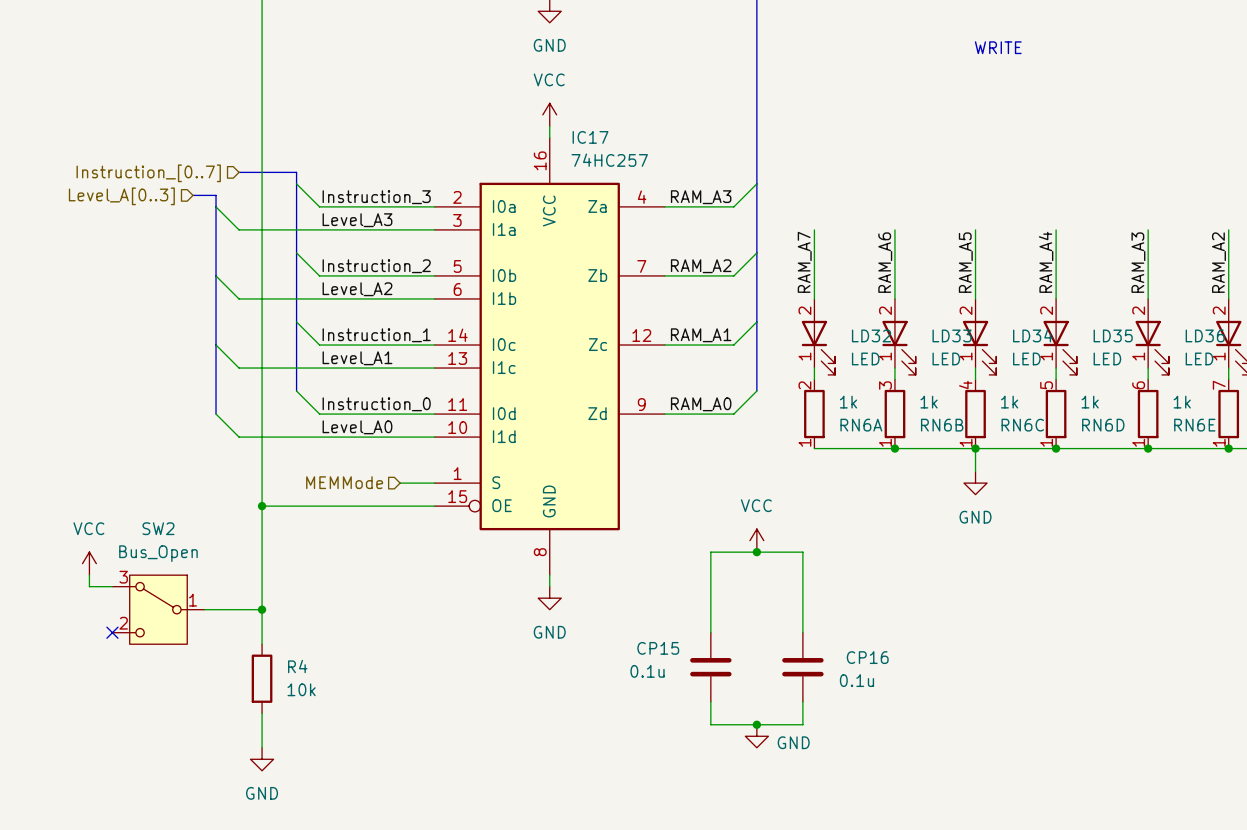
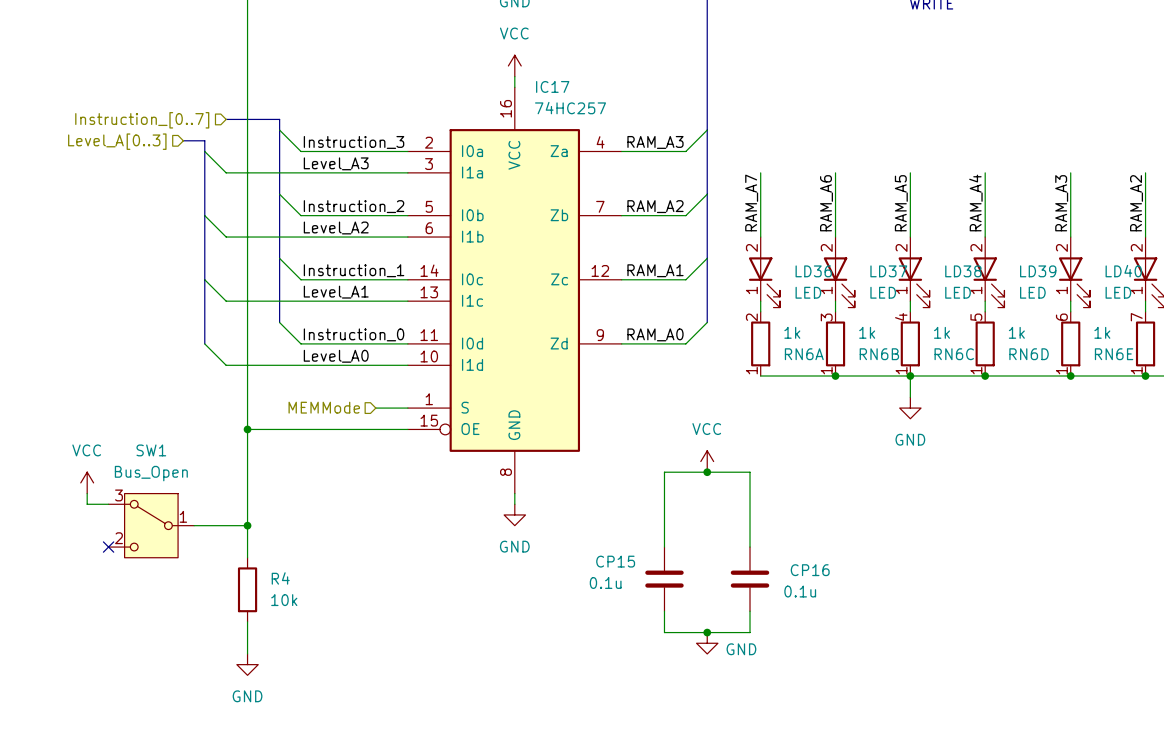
LD32 name: LD32 (871, 335) -> LD36 (813, 271)
LD33 name: LD33 (952, 335) -> LD37 (888, 271)
LD34 name: LD34 (1032, 335) -> LD38 (963, 271)
LD35 name: LD35 (1113, 335) -> LD39 (1038, 271)
LD36 name: LD36 (1205, 335) -> LD40 (1123, 271)
SW2 name: SW2 (158, 528) -> SW1 (151, 450)

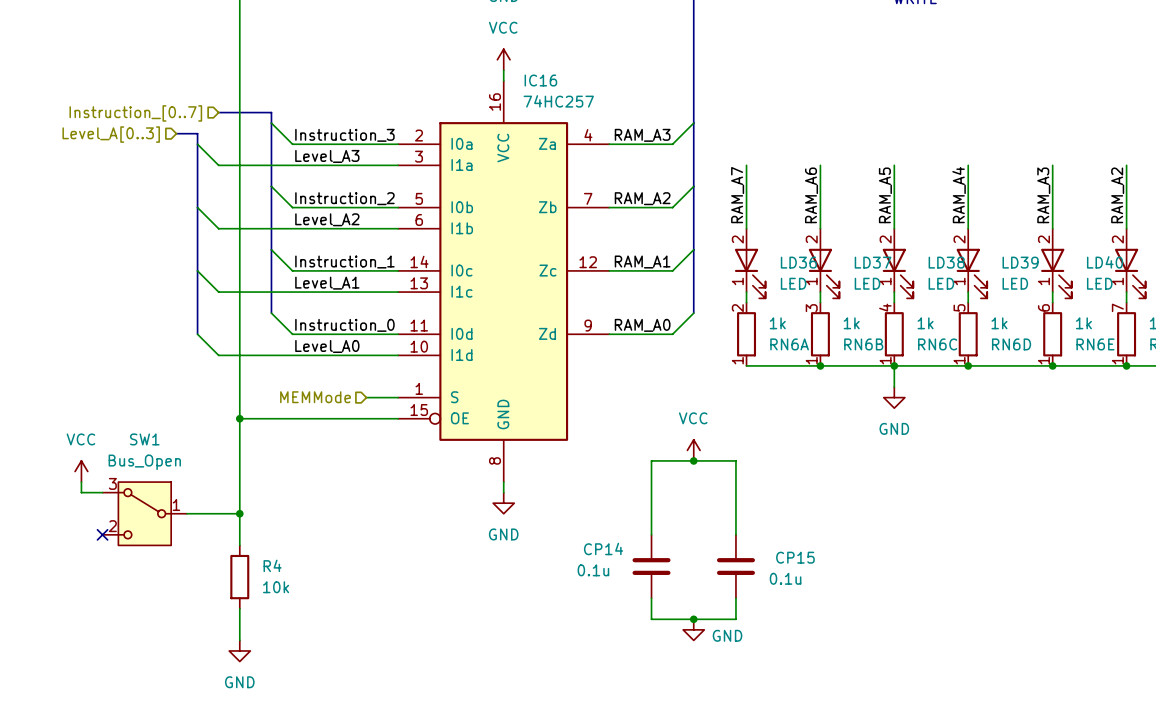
IC17 name: IC17 (552, 86) -> IC16 (540, 80)
CP15 name: CP15 (615, 561) -> CP14 (603, 548)
CP16 name: CP16 (810, 570) -> CP15 (795, 557)

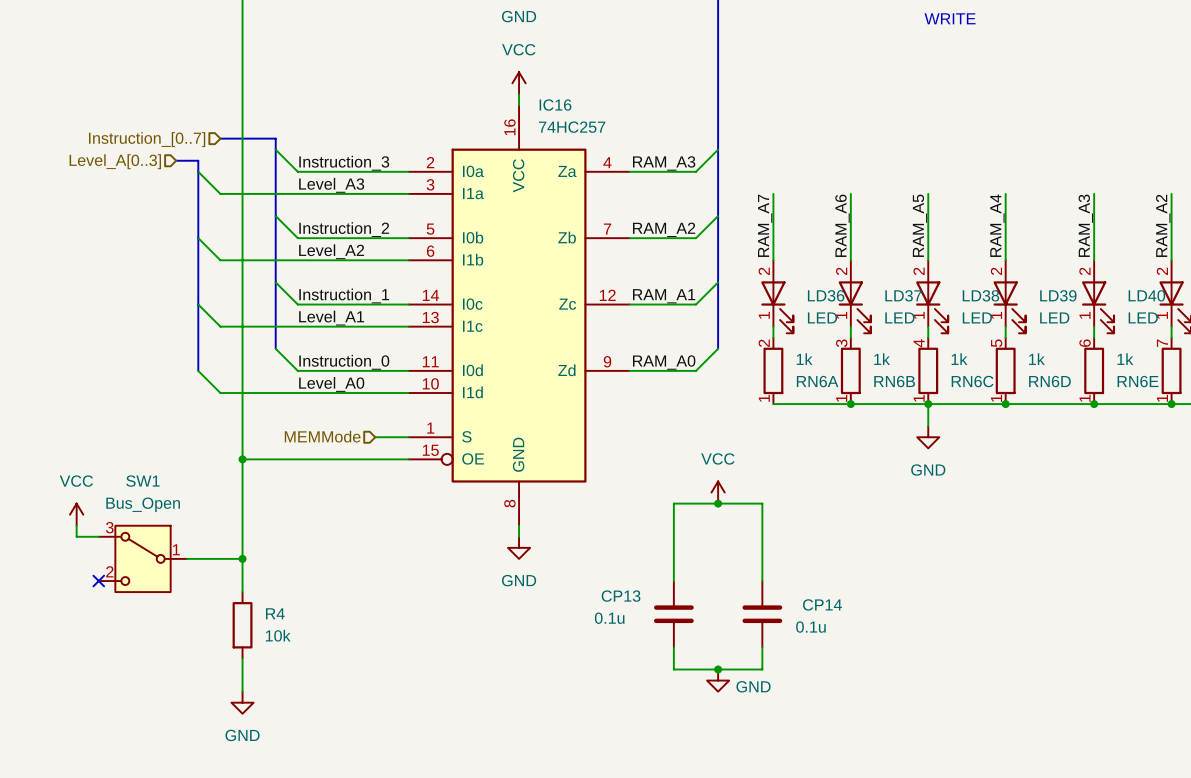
CP14 name: CP14 (603, 548) -> CP13 (621, 596)
CP15 name: CP15 (795, 557) -> CP14 (822, 604)

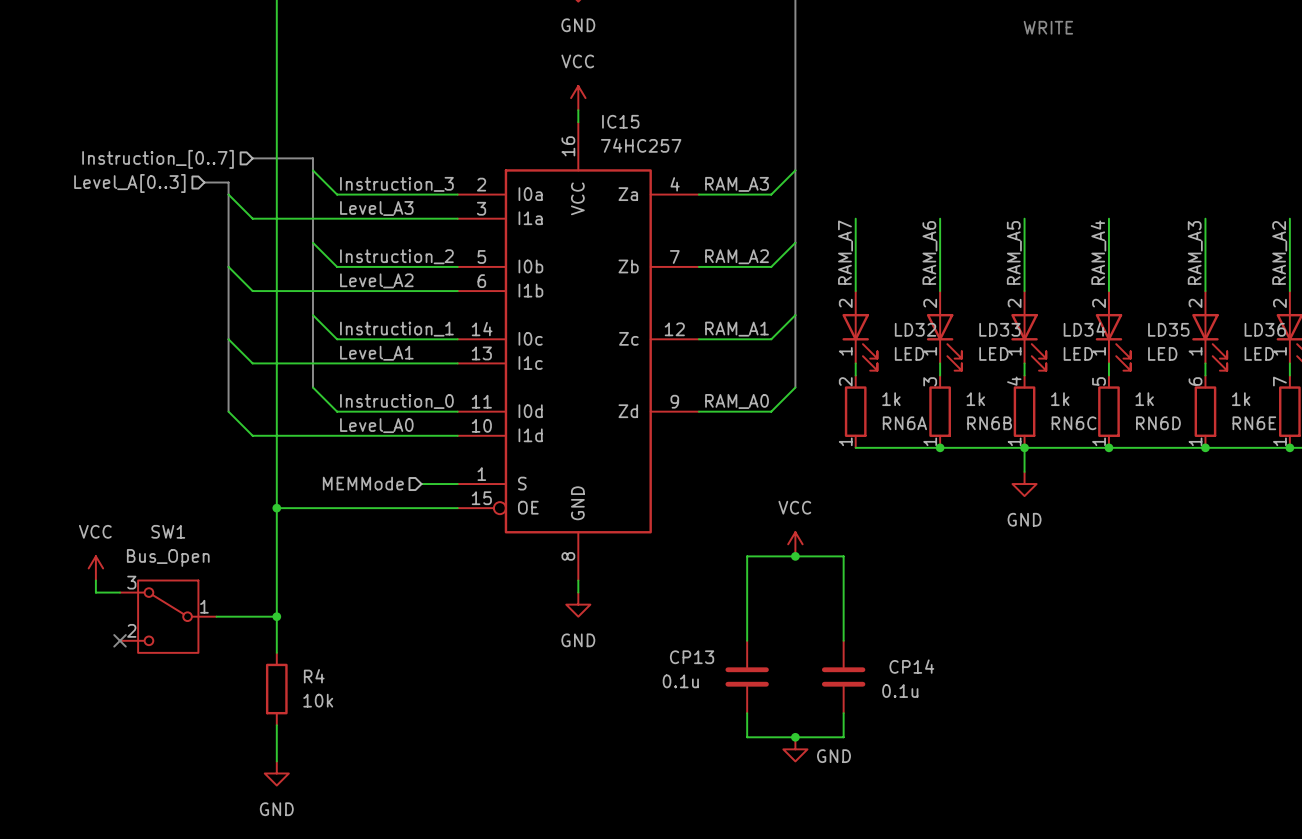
IC16 name: IC16 (555, 105) -> IC15 (620, 121)
LD36 name: LD36 (826, 295) -> LD32 (915, 329)
LD37 name: LD37 (903, 295) -> LD33 (999, 329)
LD38 name: LD38 (980, 295) -> LD34 (1084, 329)
LD39 name: LD39 (1058, 295) -> LD35 (1168, 329)
LD40 name: LD40 (1146, 295) -> LD36 (1265, 329)

